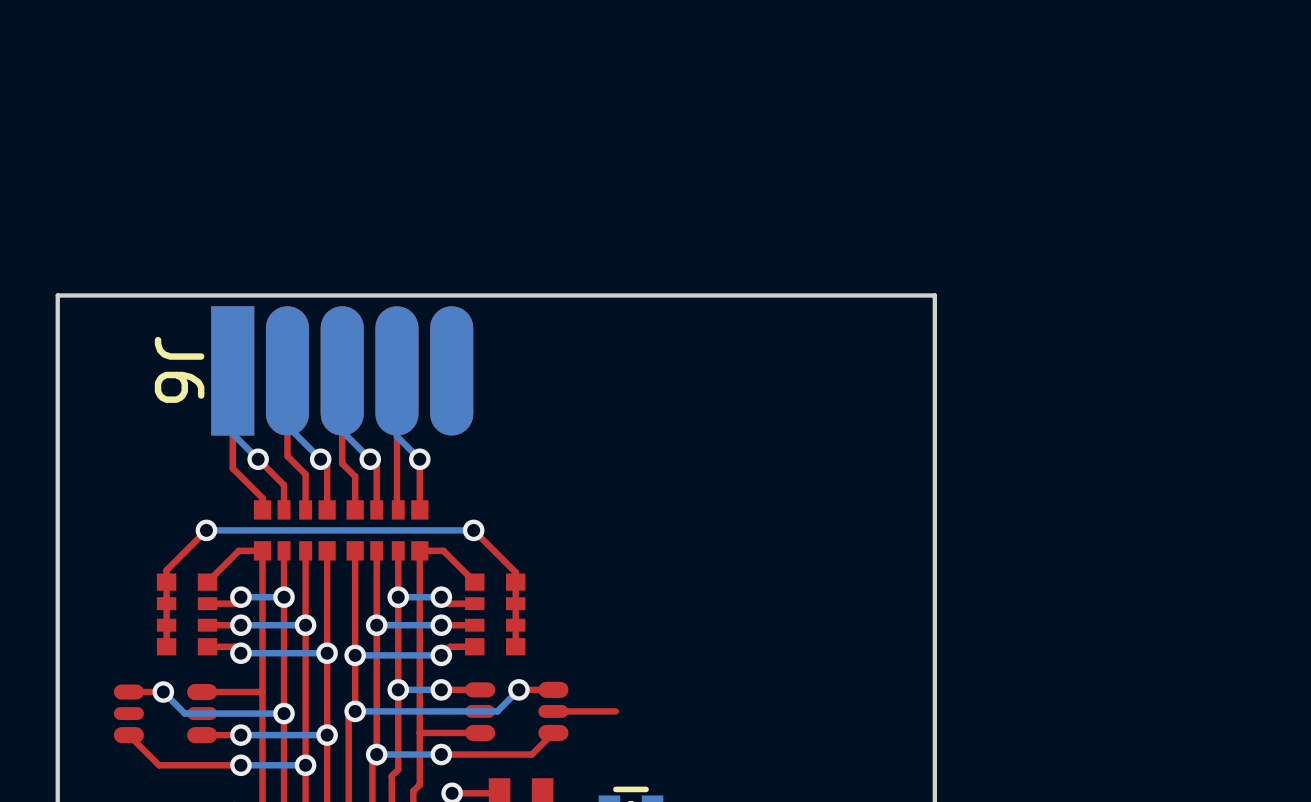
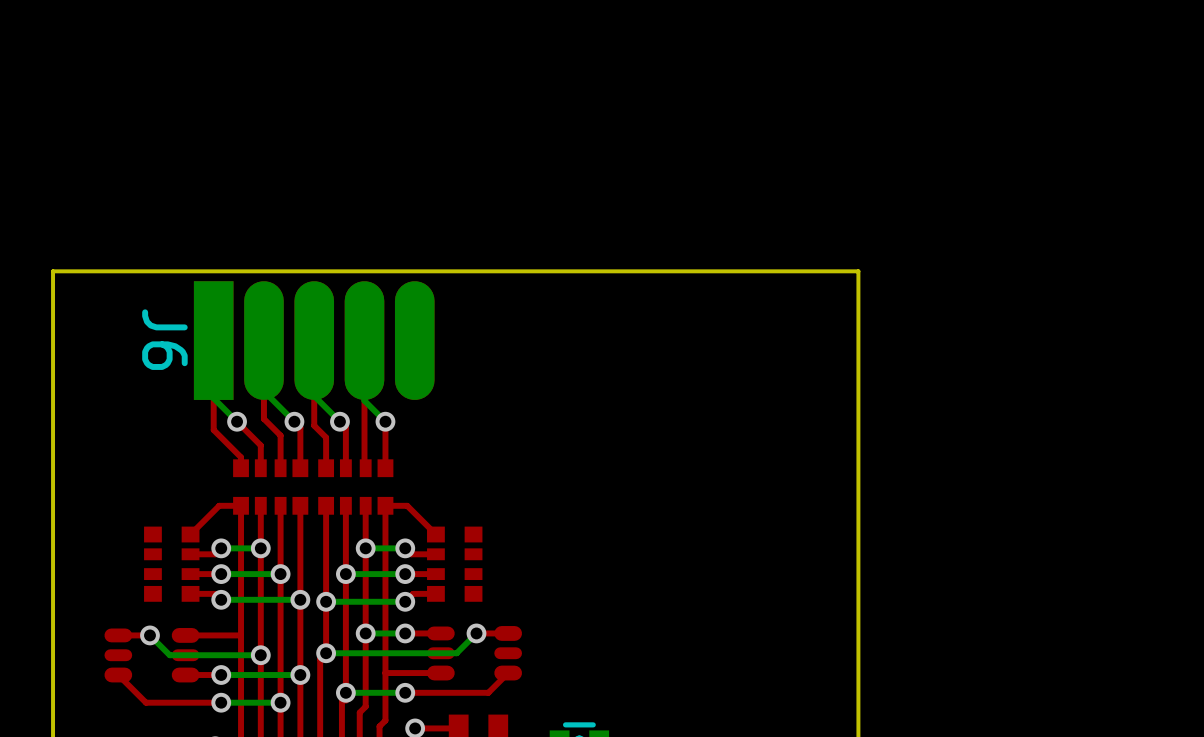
top track: (206, 530) (166, 570) (166, 646) -> none
via: (206, 530) -> none
top track: (473, 530) (515, 572) (515, 646) -> none
bottom track: (473, 530) (206, 530) -> none
via: (473, 530) -> none
top track: (615, 711) (553, 711) -> none

